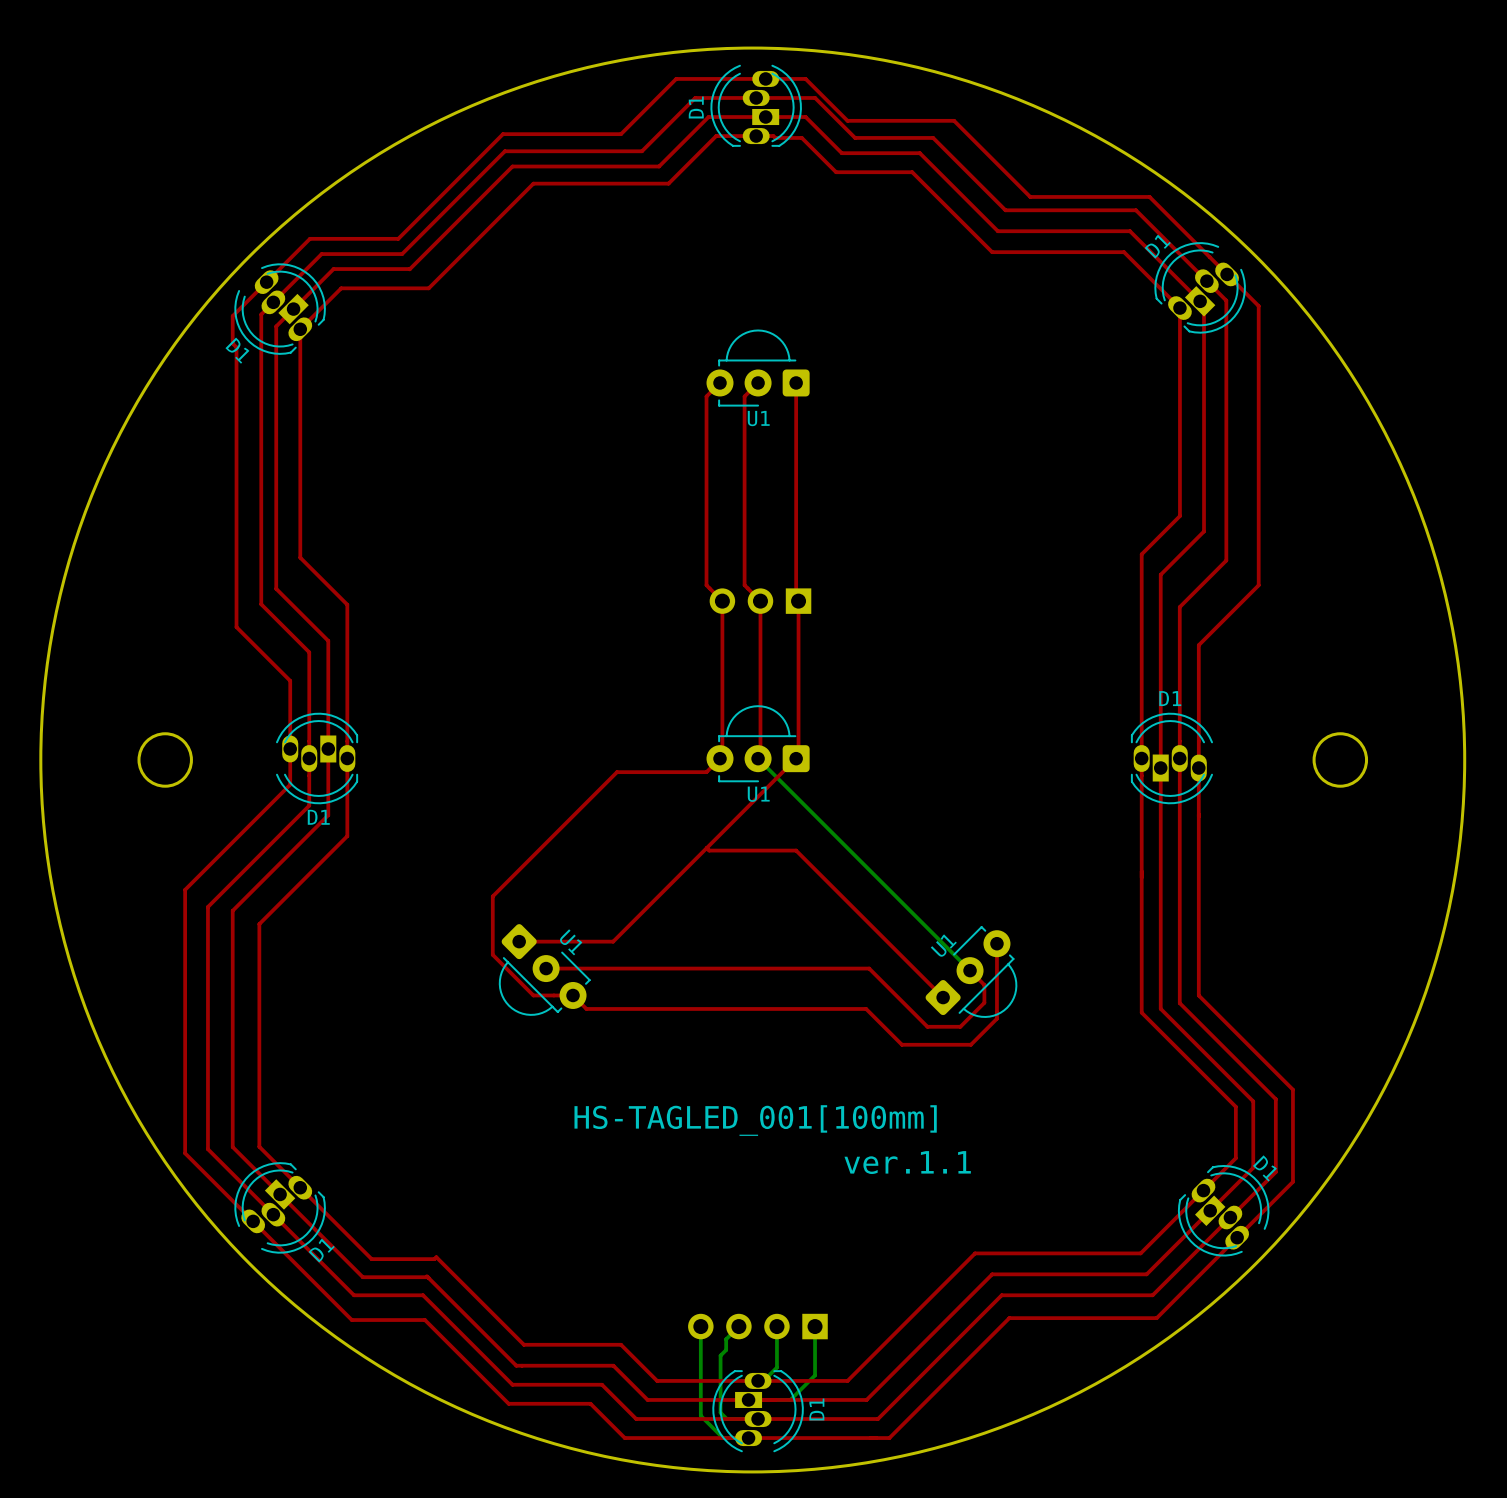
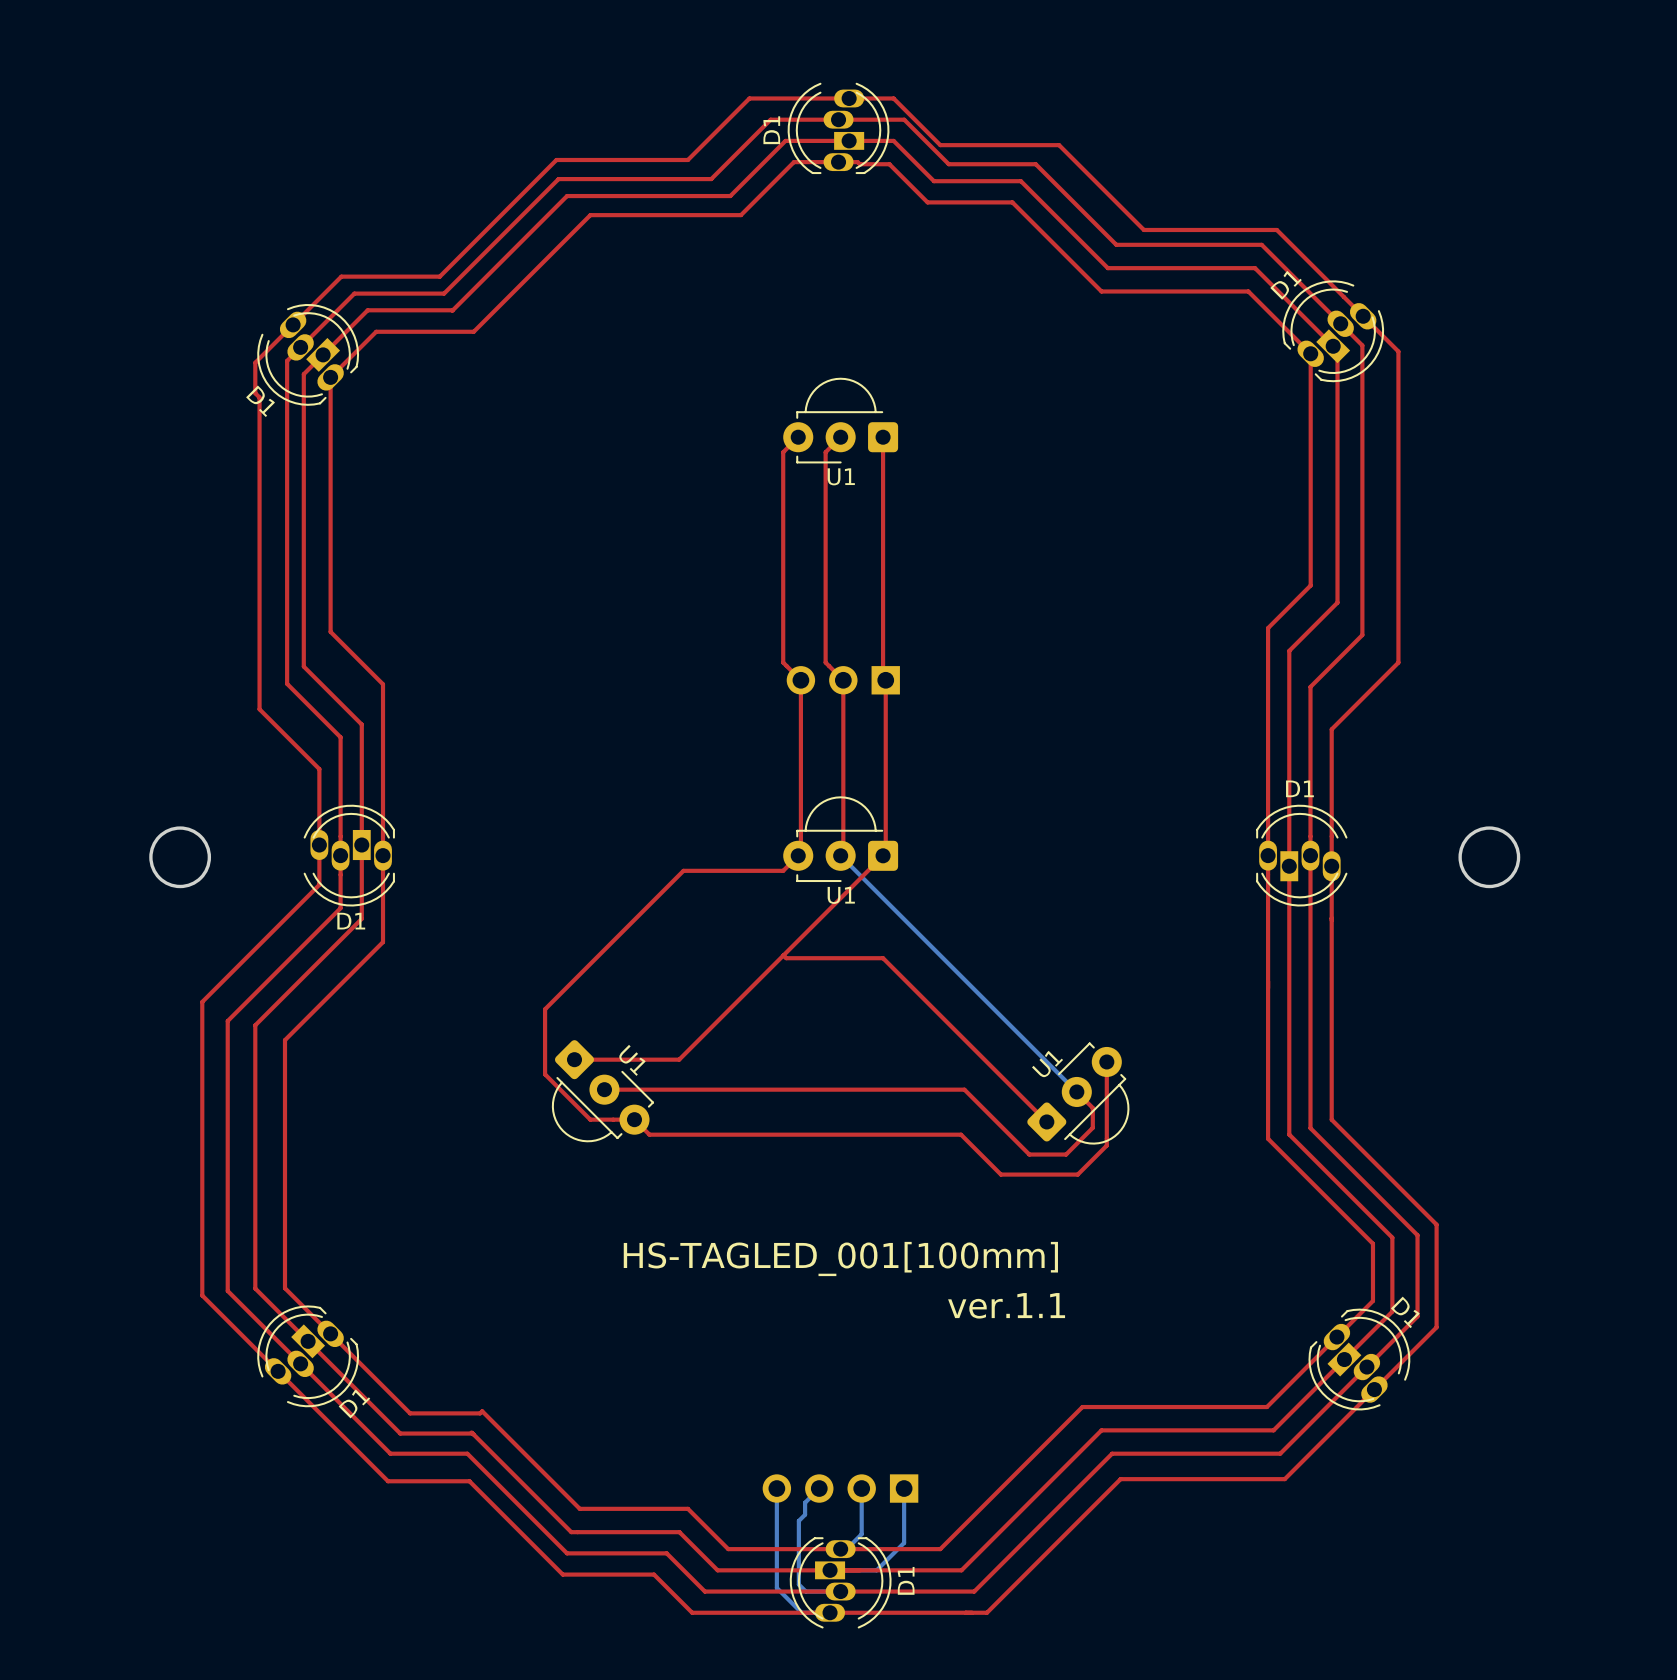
round board edge: [39, 46, 1467, 1474] -> none

